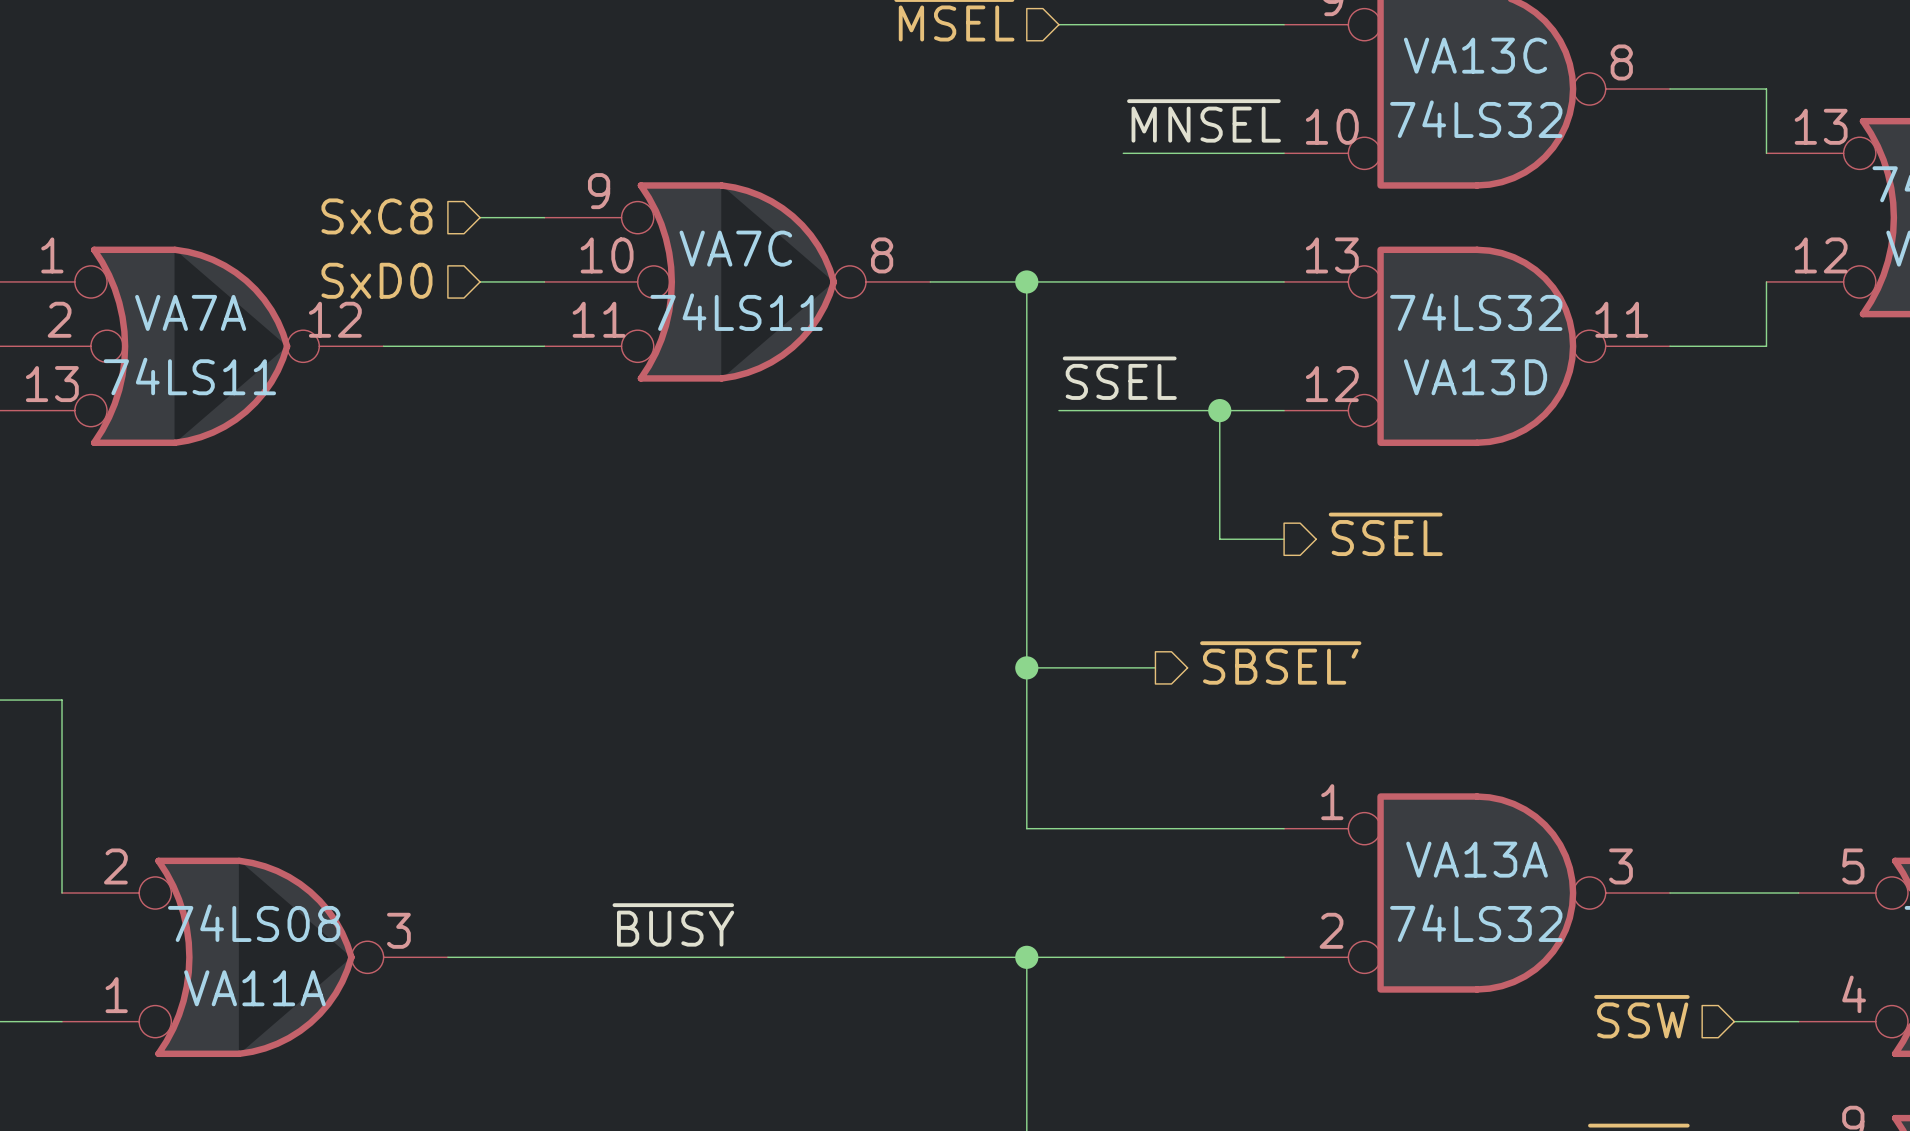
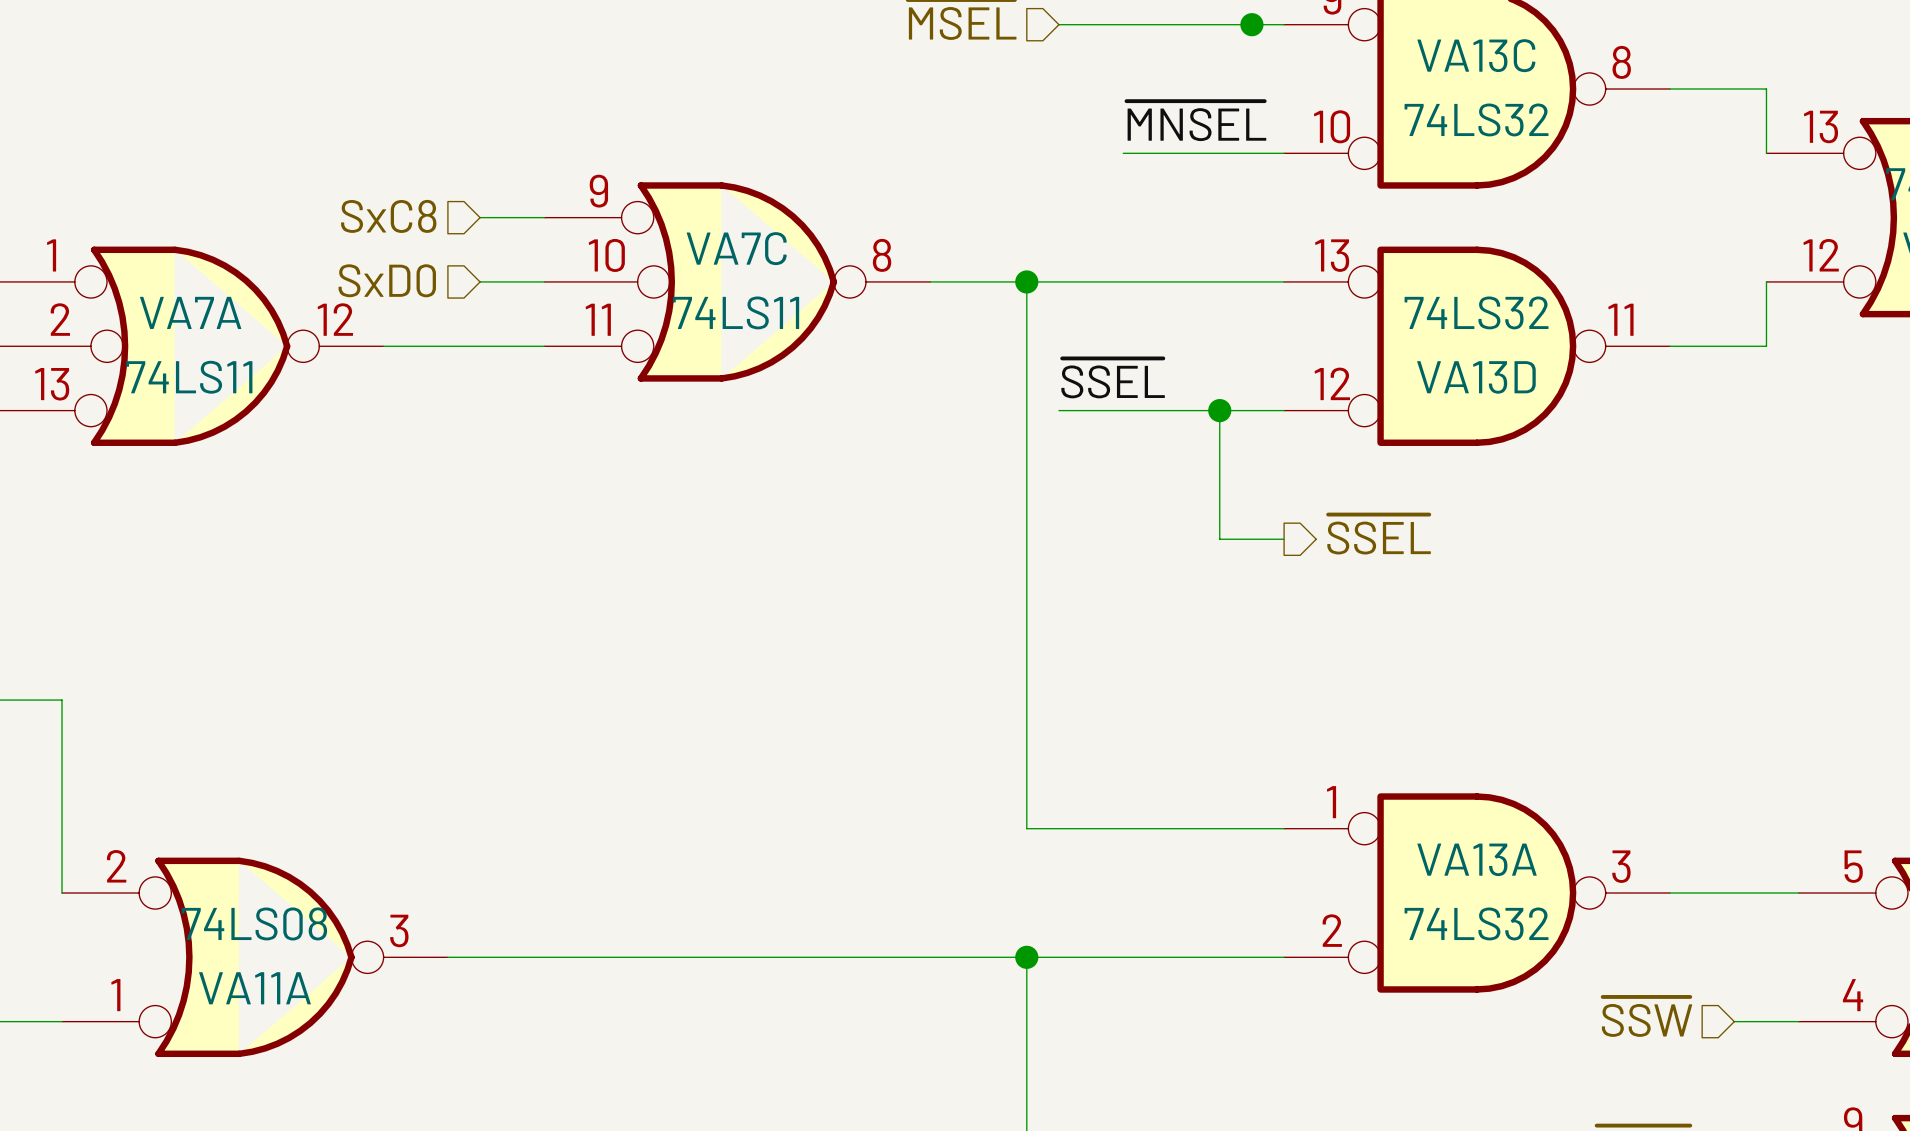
junction: none -> (1251, 24)
hierarchical label: ~{SBSEL'} (1280, 662) -> none
wire: (1026, 667) (1155, 667) -> none
junction: (1026, 667) -> none
label: ~{BUSY} (673, 924) -> none

